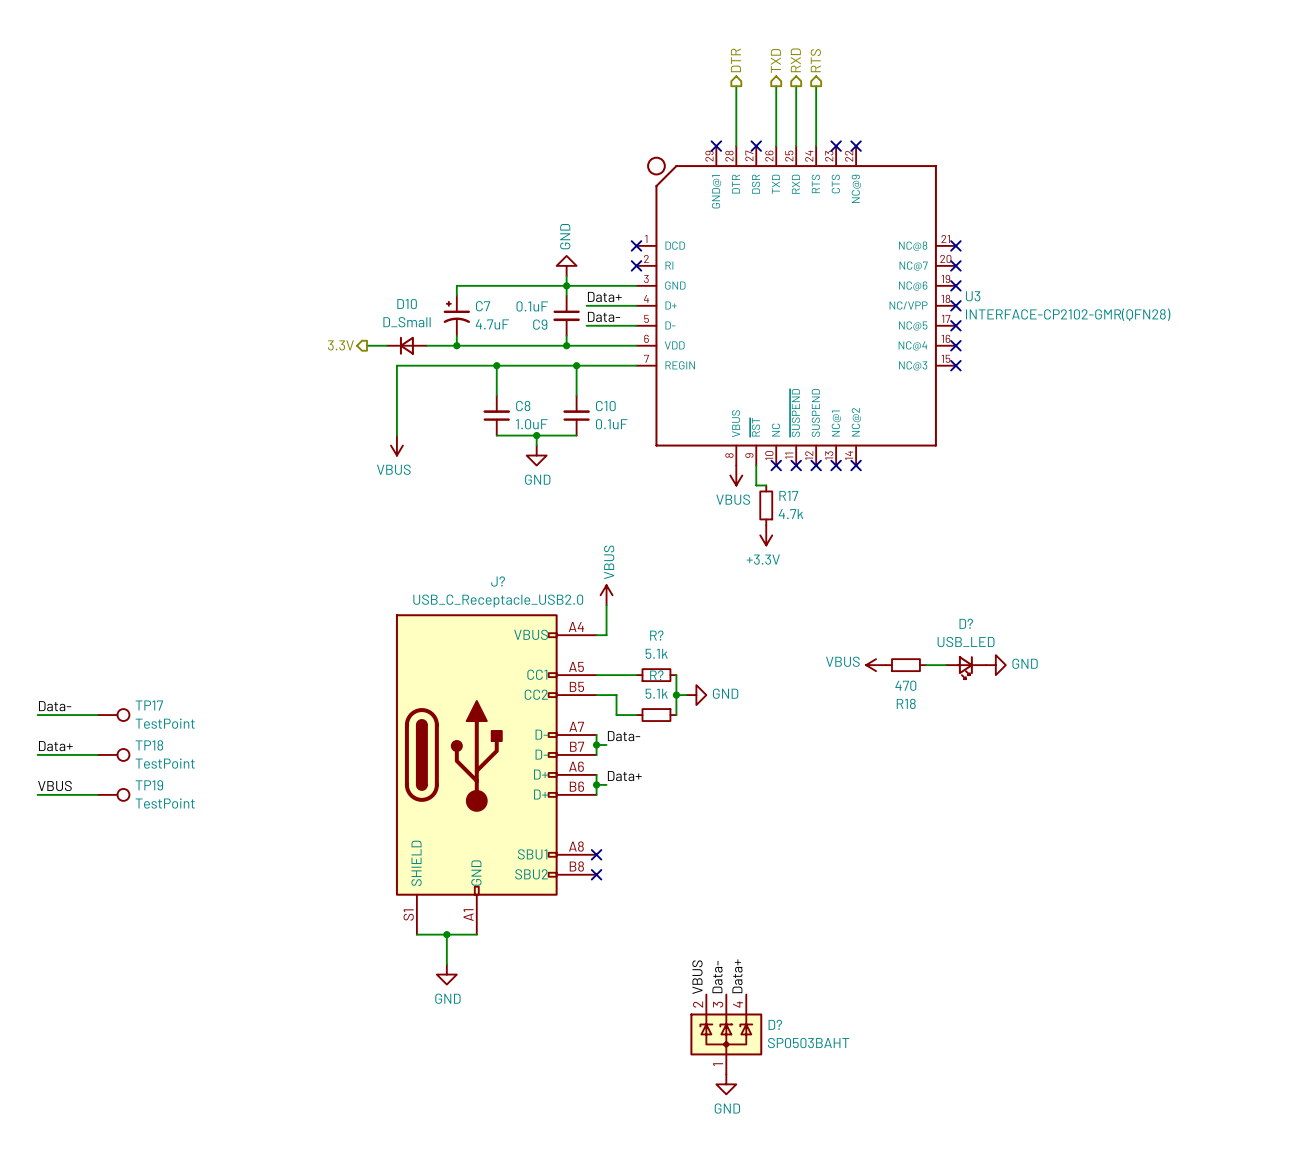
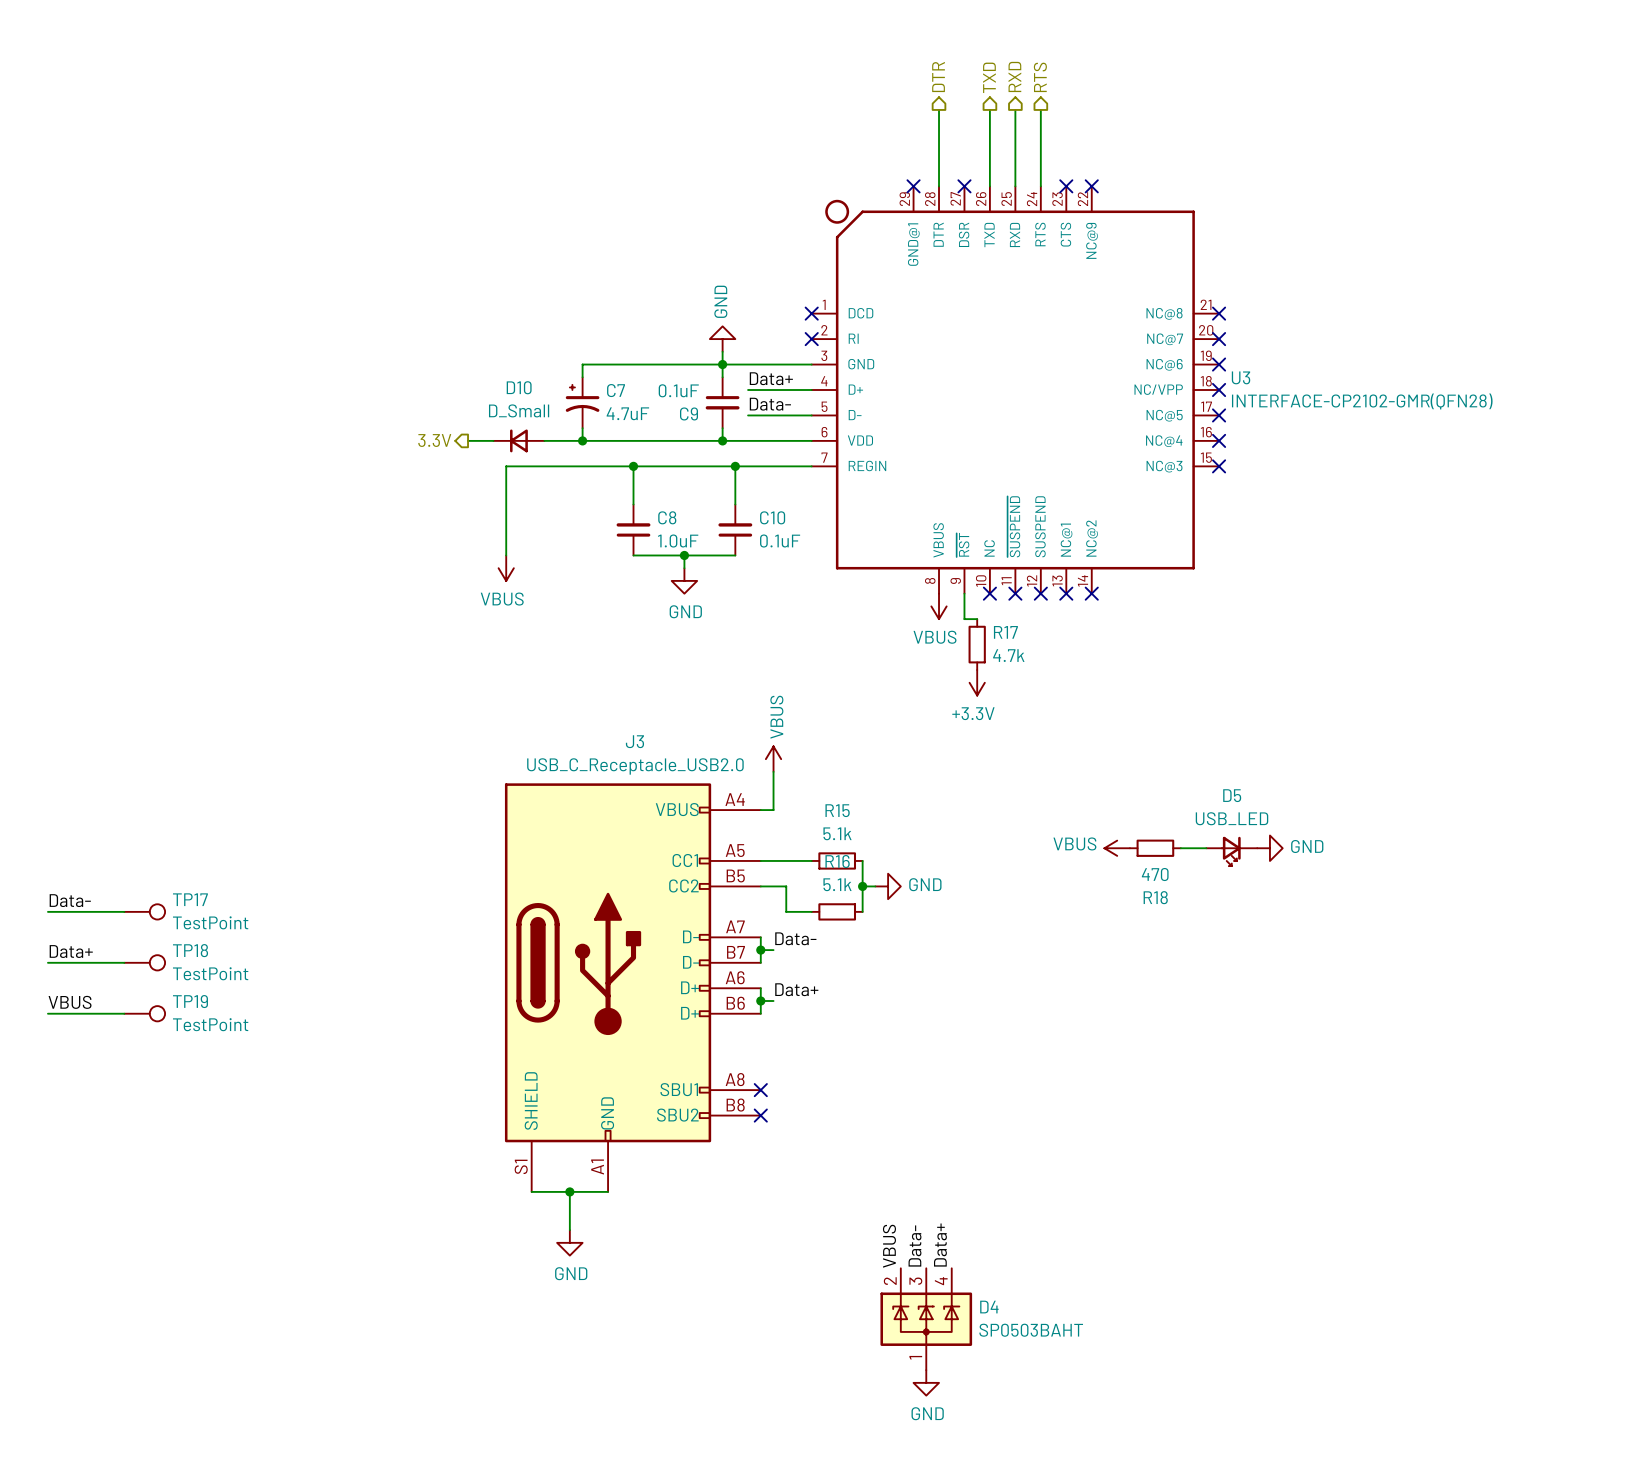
J? name: J? (498, 581) -> J3 (634, 741)
D? name: D? (966, 623) -> D5 (1232, 795)
R? name: R? (656, 635) -> R15 (837, 810)
R? name: R? (656, 675) -> R16 (837, 861)
D? name: D? (775, 1024) -> D4 (989, 1307)

